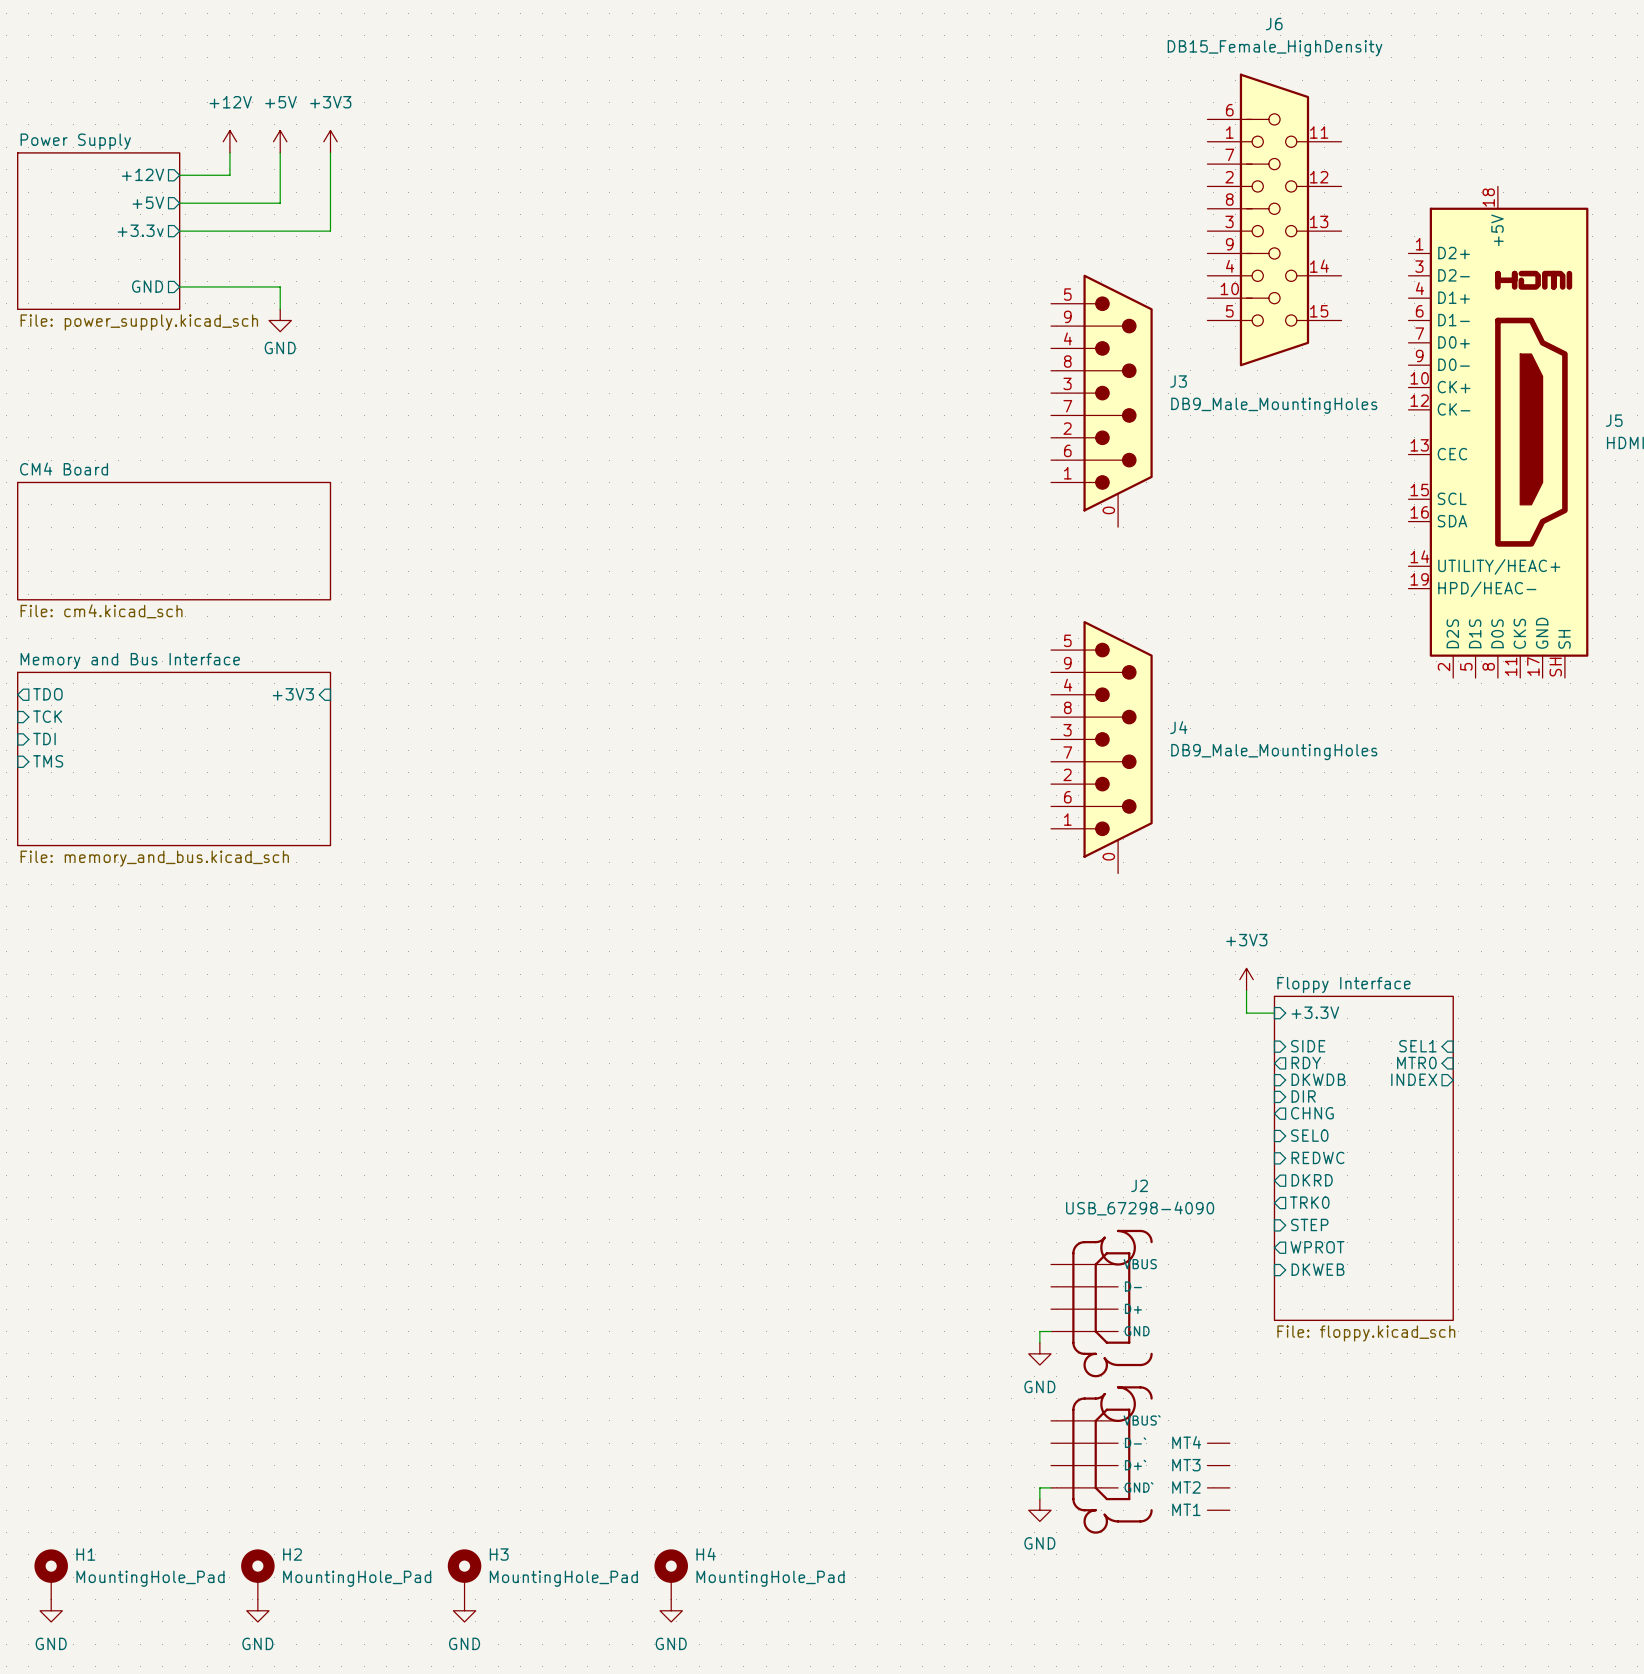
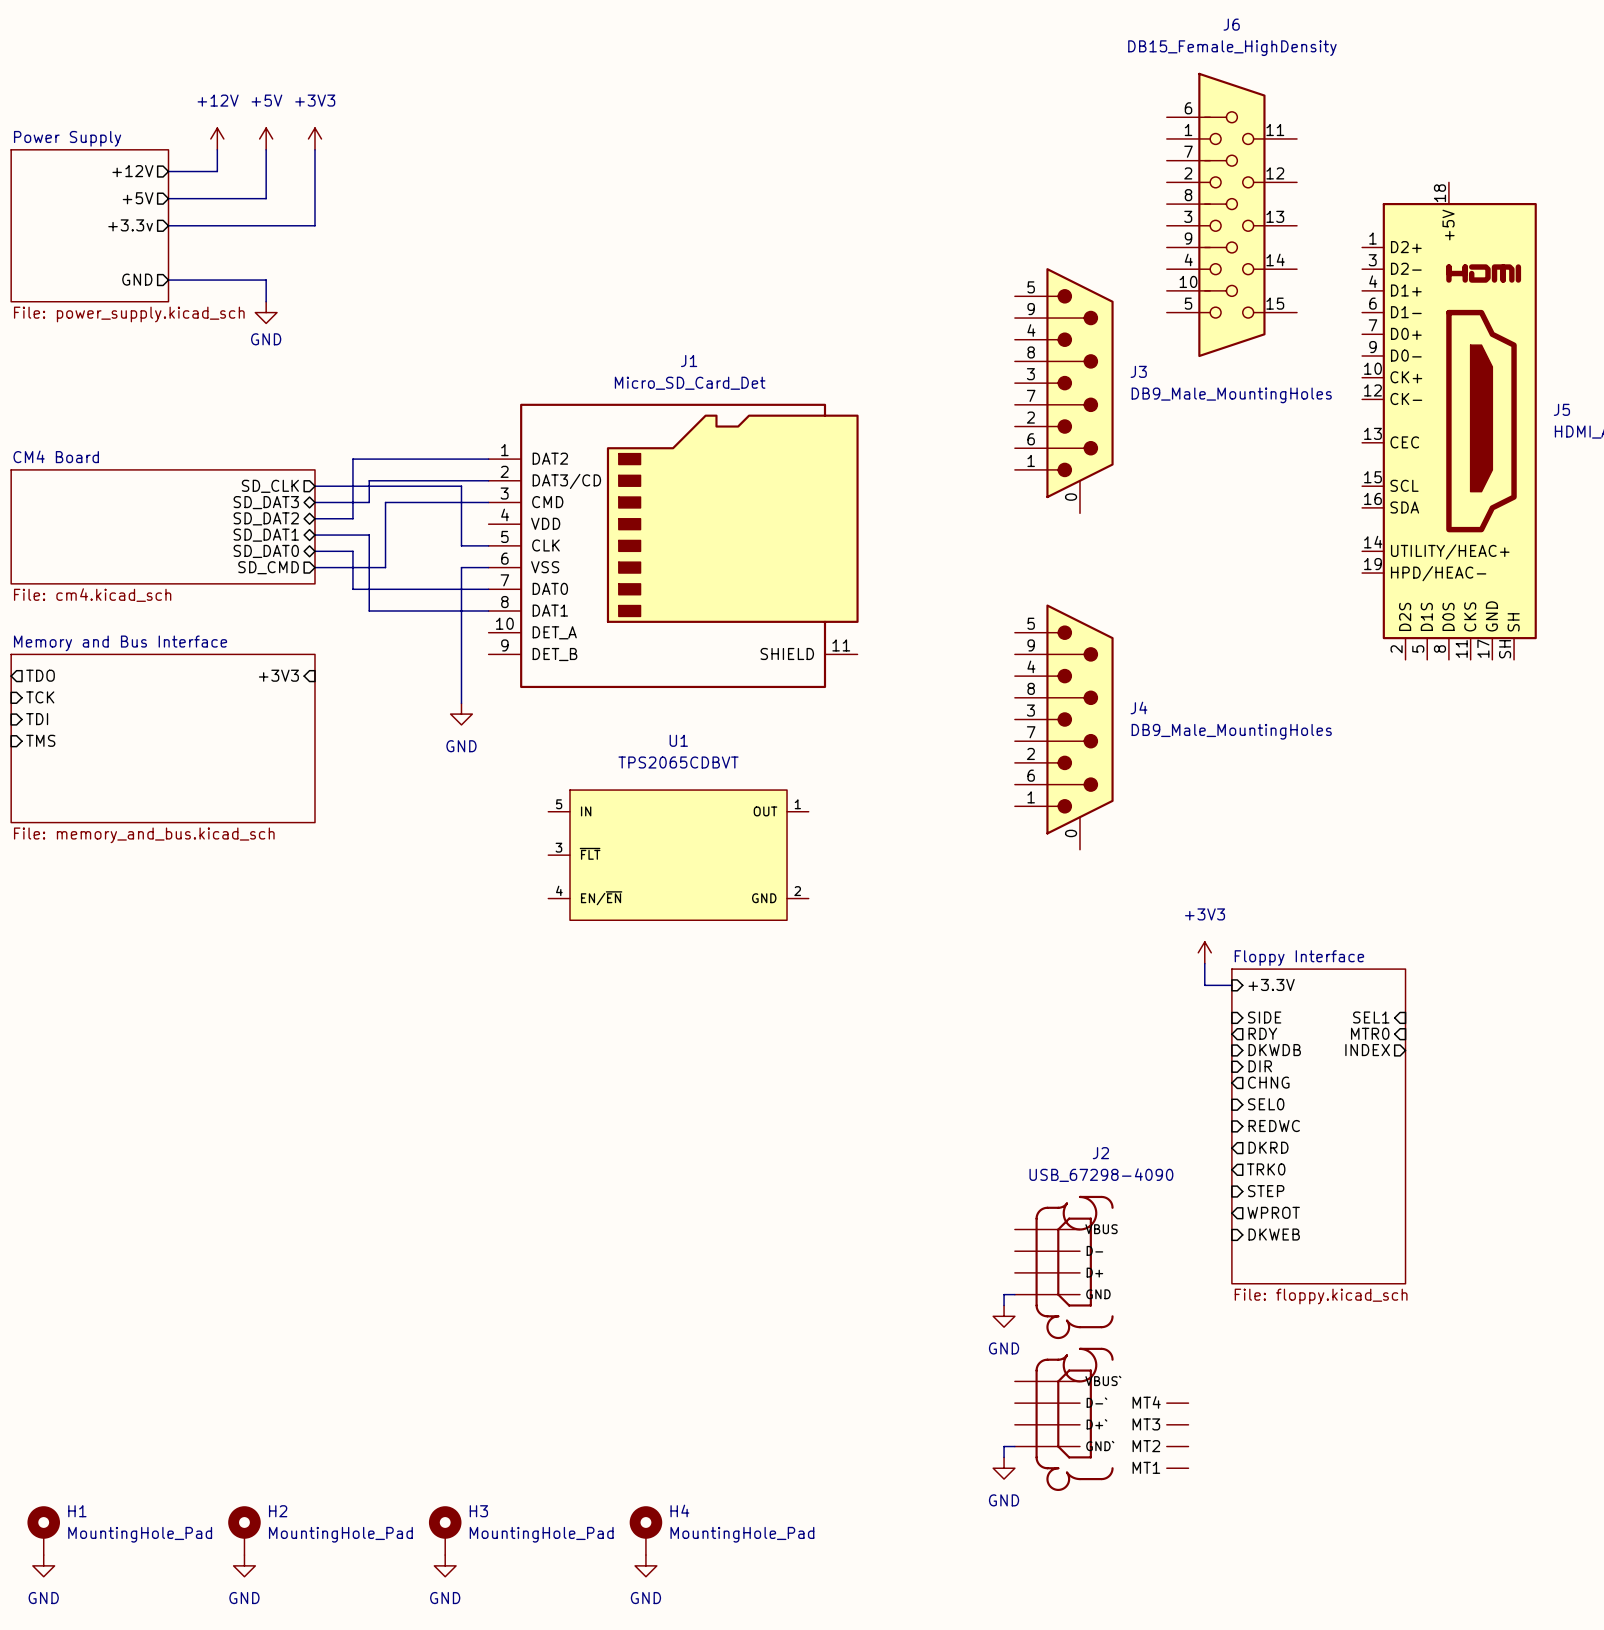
wire: none -> (488, 459) (352, 459) (352, 518) (314, 518)
wire: none -> (488, 480) (369, 480) (369, 502) (314, 502)
sheet pin: none -> SD_CLK (270, 486)
wire: none -> (314, 486) (461, 486) (461, 545) (488, 545)
wire: none -> (488, 502) (385, 502) (385, 567) (314, 567)
sheet pin: none -> SD_DAT3 (266, 502)
sheet pin: none -> SD_DAT2 (266, 518)
sheet pin: none -> SD_DAT1 (266, 535)
wire: none -> (314, 535) (369, 535) (369, 610) (488, 610)
J1: none -> Micro_SD_Card_Det (673, 545)
sheet pin: none -> SD_DAT0 (266, 551)
wire: none -> (314, 551) (352, 551) (352, 589) (488, 589)
sheet pin: none -> SD_CMD (268, 567)
wire: none -> (488, 567) (461, 567) (461, 703)
power symbol: none -> GND (461, 714)
U1: none -> TPS2065CDBVT (678, 855)

